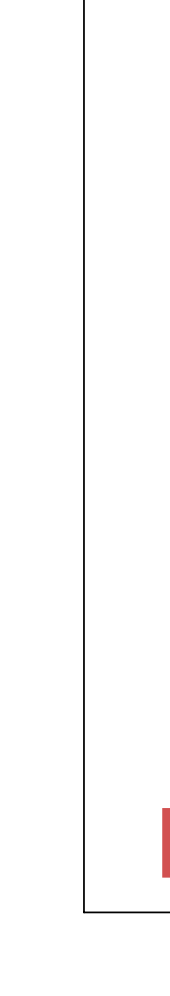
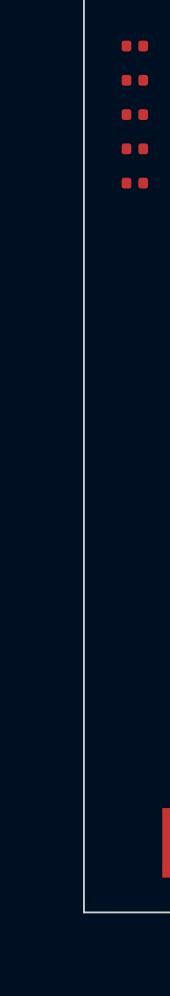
part: none -> (134, 46)
part: none -> (134, 80)
part: none -> (134, 114)
part: none -> (134, 148)
part: none -> (134, 183)

